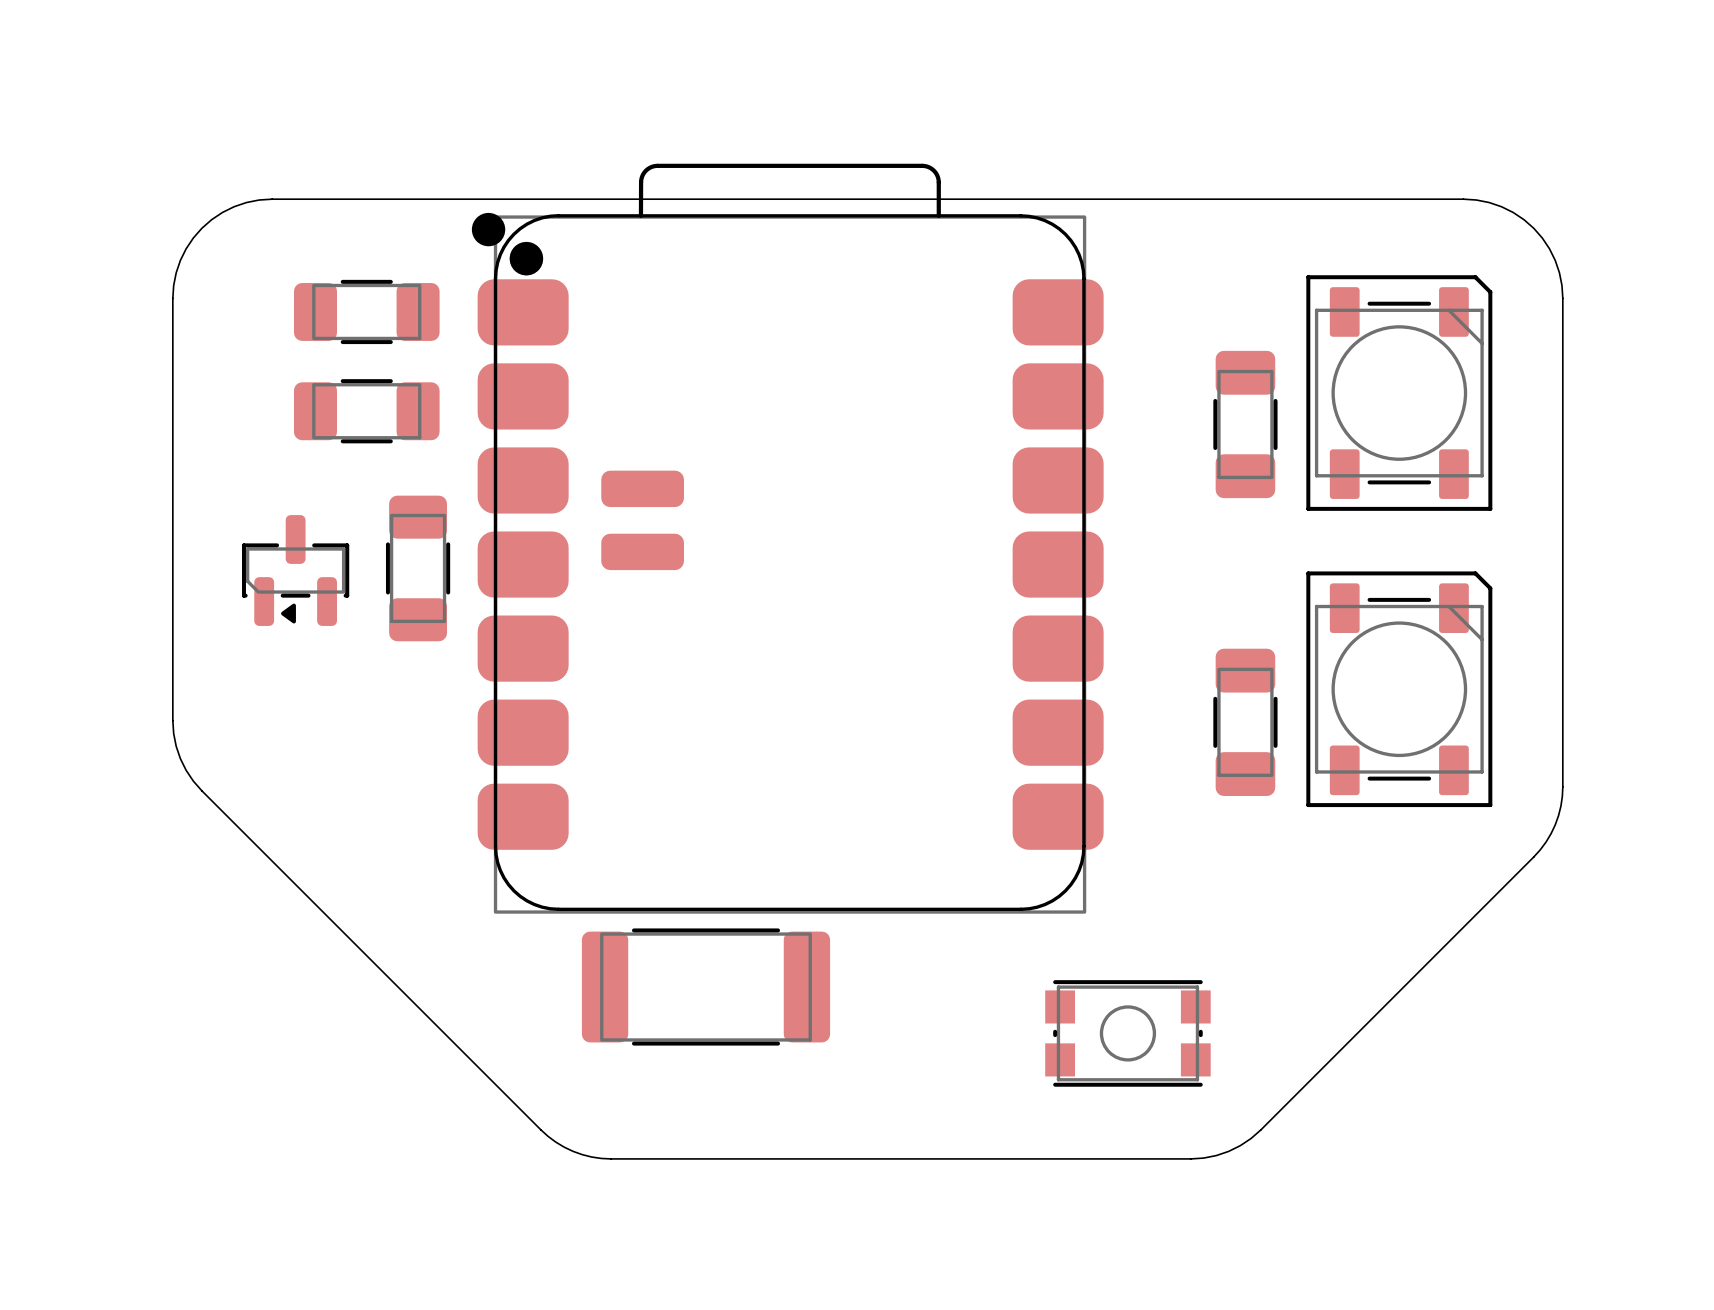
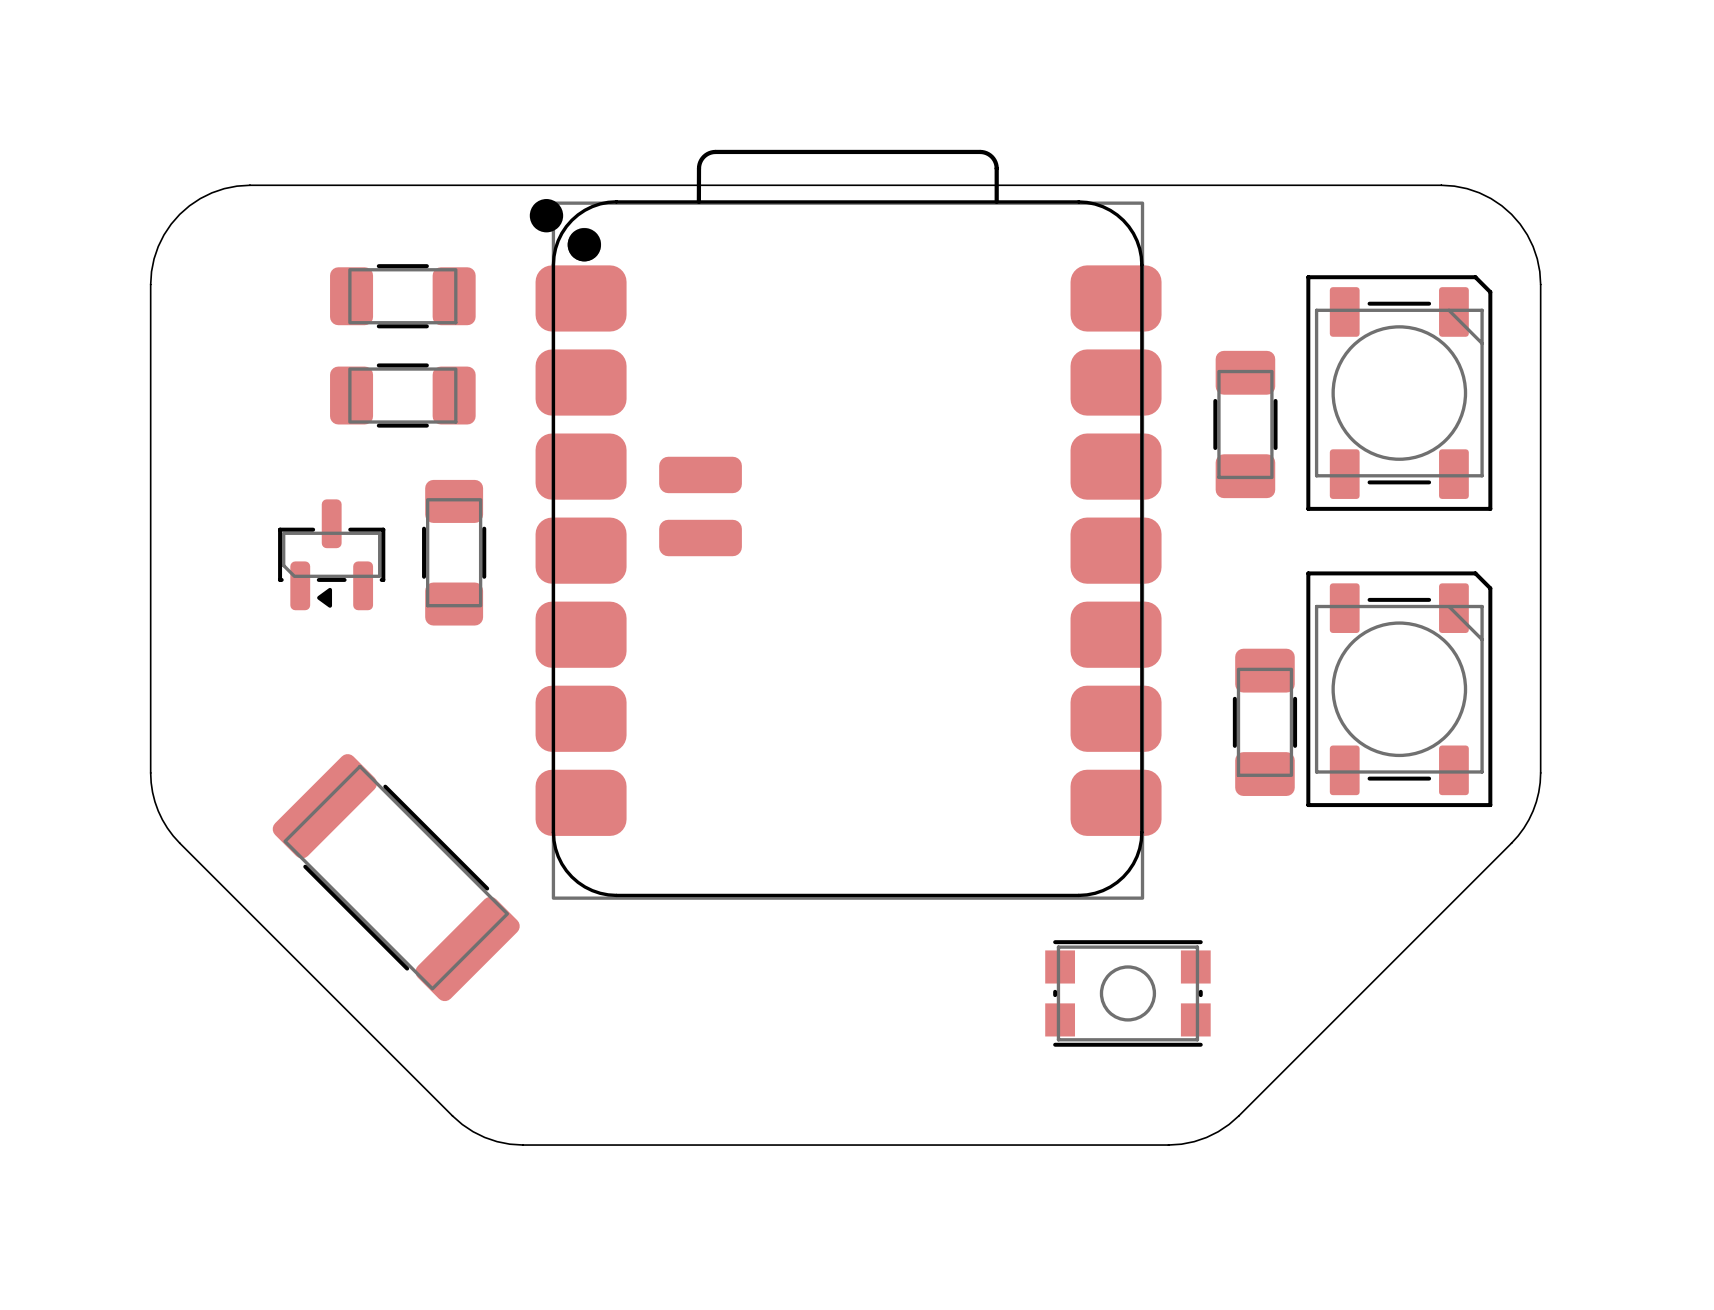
board edge: (272, 199) (1463, 199) (1489, 202) (1513, 212) (1533, 228) (1549, 248) (1559, 272) (1562, 298) (1562, 786) (1558, 815) (1551, 833) (1533, 857) (1260, 1129) (1240, 1145) (1216, 1155) (1190, 1158) (611, 1158) (582, 1154) (564, 1147) (540, 1129) (201, 790) (186, 770) (176, 746) (172, 720) (173, 285) (180, 260) (186, 248) (201, 228) (211, 219) (234, 206) (246, 202) (272, 199) -> (249, 185) (224, 188) (200, 198) (189, 205) (179, 214) (163, 234) (154, 258) (151, 271) (150, 772) (152, 792) (162, 819) (179, 843) (452, 1115) (473, 1131) (497, 1141) (522, 1145) (1168, 1145) (1194, 1141) (1218, 1131) (1238, 1115) (1511, 843) (1528, 819) (1538, 792) (1540, 772) (1540, 284) (1537, 258) (1527, 234) (1511, 214) (1491, 198) (1467, 188) (1441, 185) (249, 185)
part position: (366, 311) -> (402, 296)
part position: (366, 411) -> (402, 395)
part position: (787, 538) -> (845, 524)
part position: (418, 568) -> (454, 552)
part position: (295, 570) -> (331, 554)
part position: (1245, 722) -> (1264, 722)
part: none -> (396, 877)
part: (705, 987) -> none
part position: (1127, 1033) -> (1127, 993)

